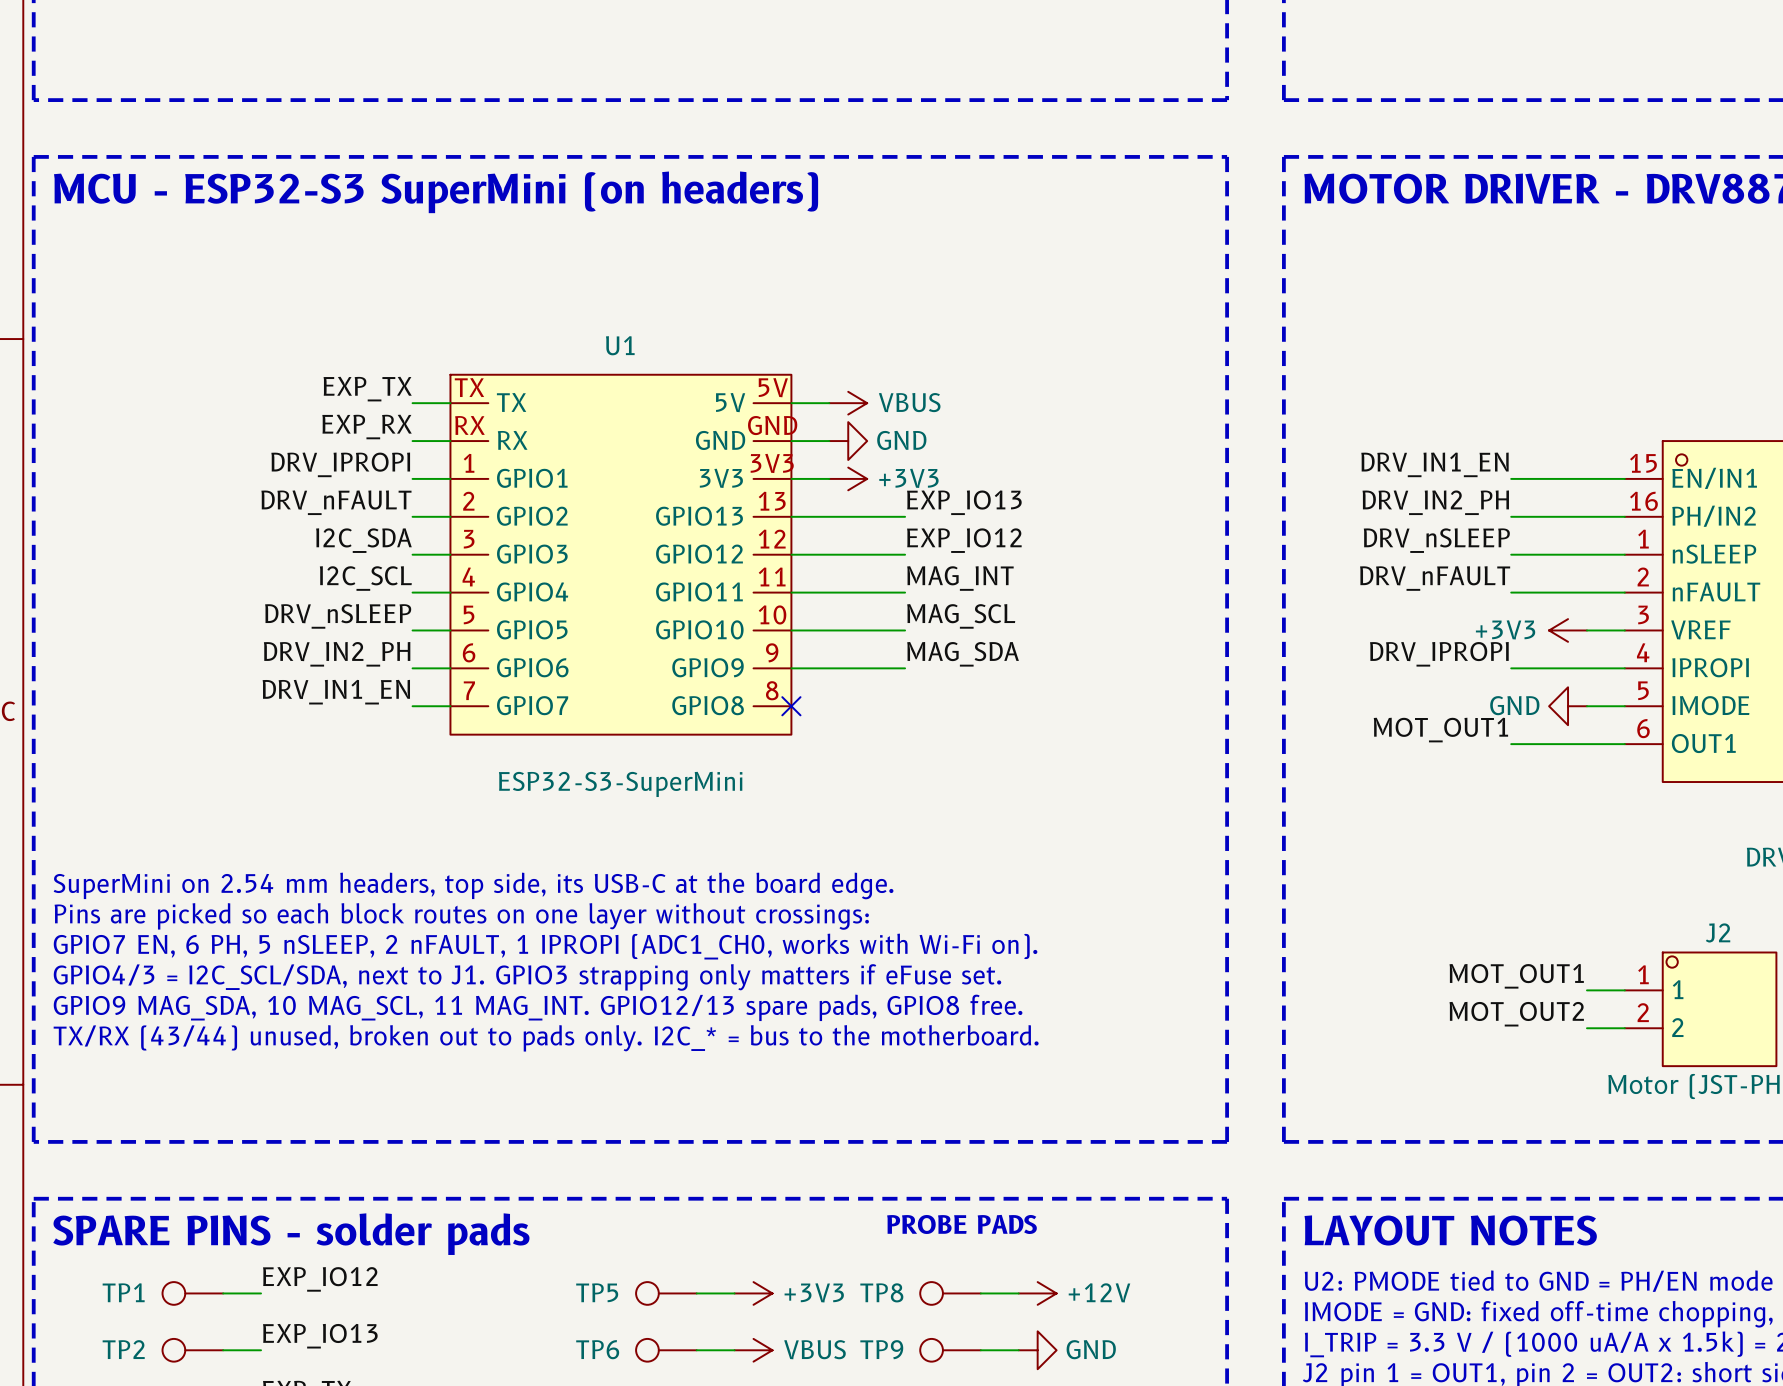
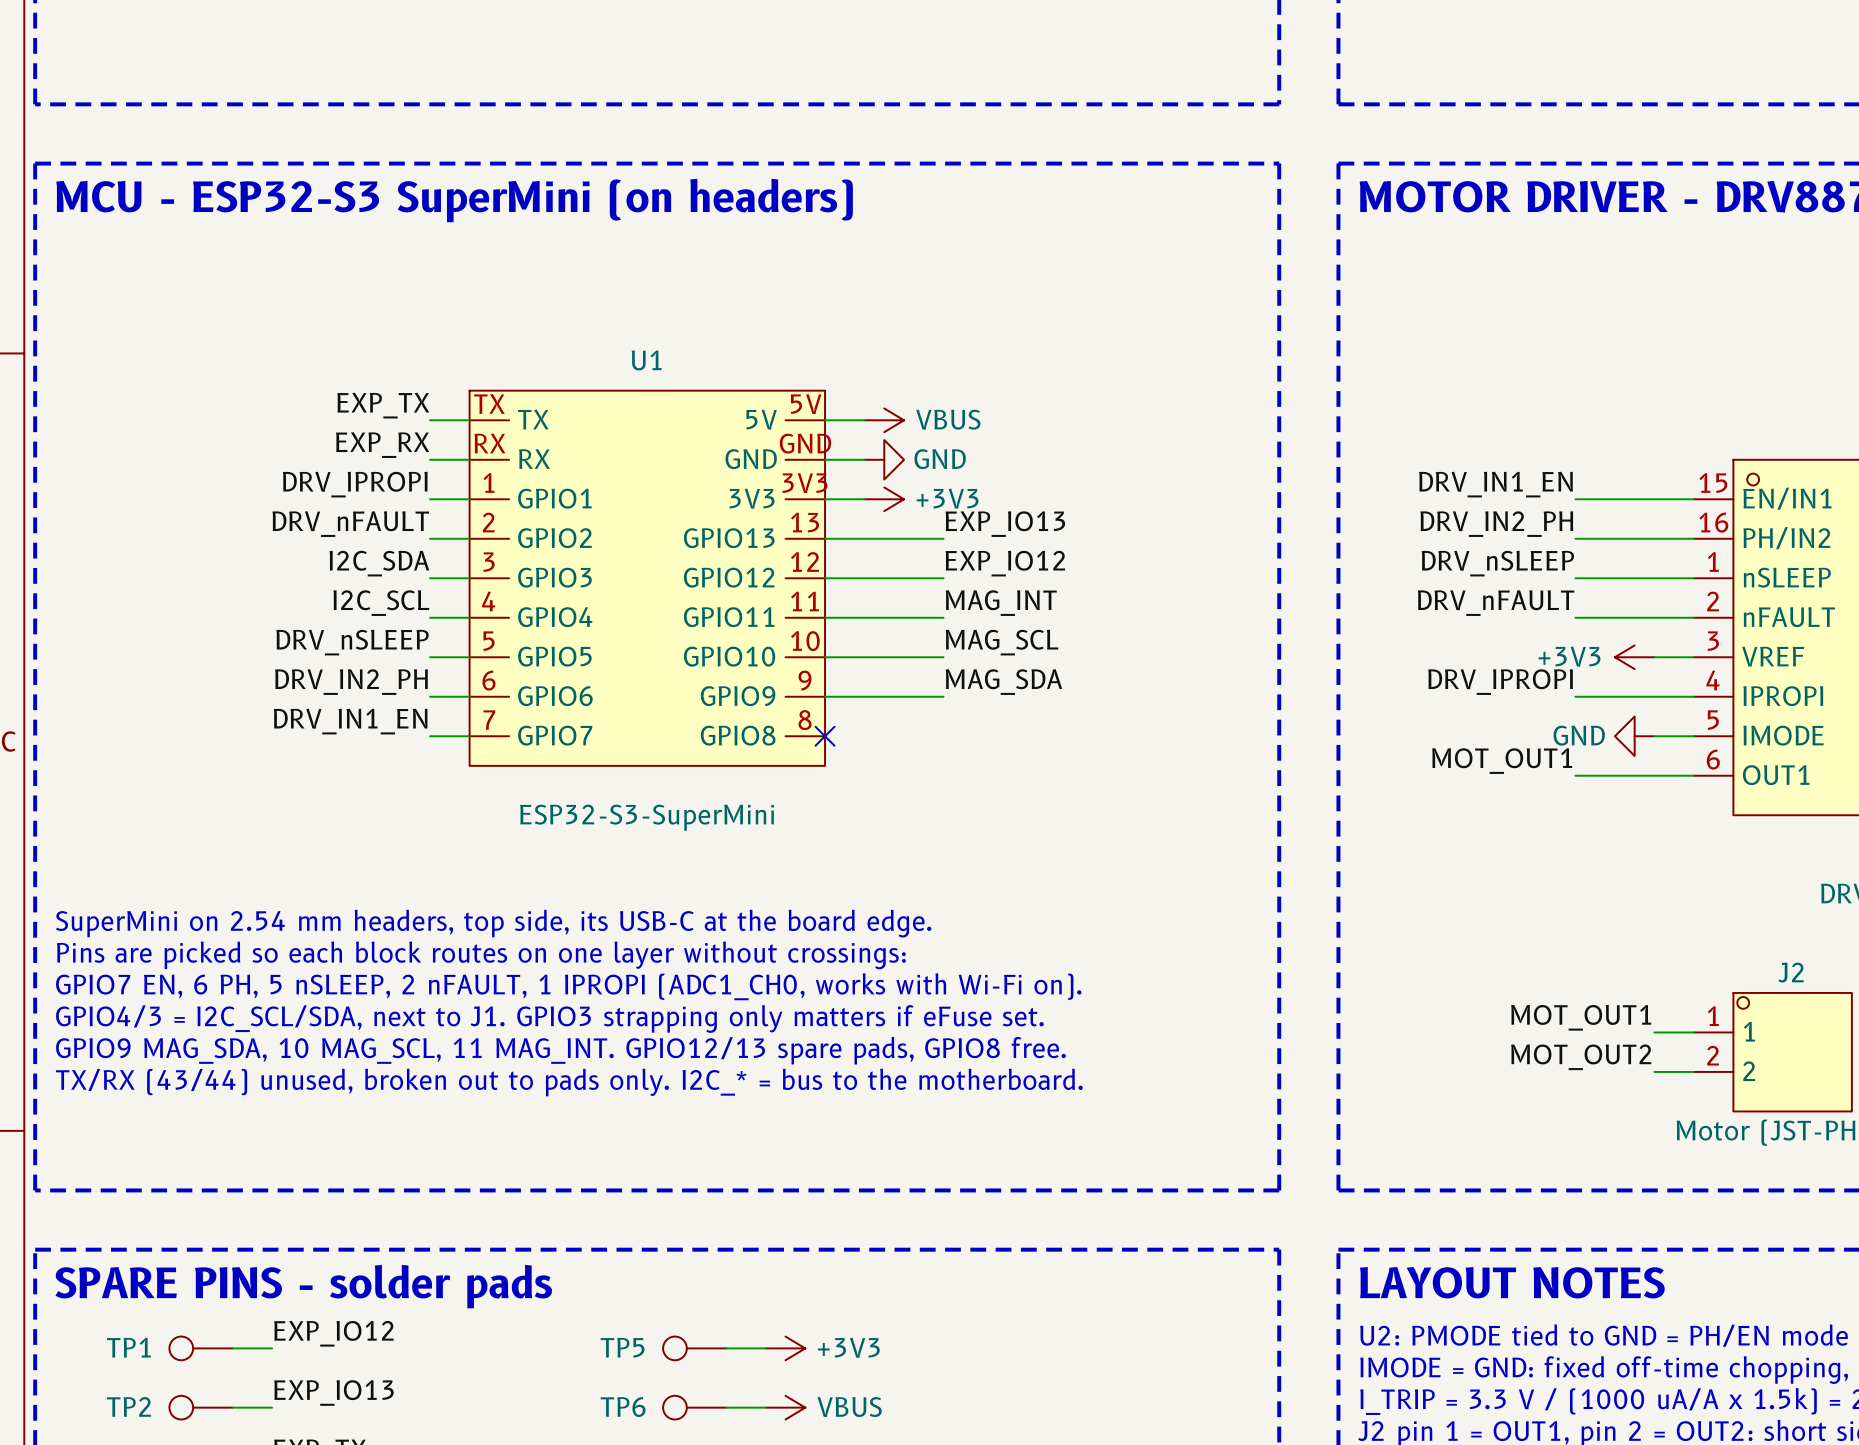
text: PROBE PADS (961, 1224) -> none
TP8: (950, 1293) -> none
wire: (980, 1293) (1018, 1293) -> none
power symbol: +12V (1037, 1293) -> none
TP9: (950, 1350) -> none
wire: (980, 1350) (1018, 1350) -> none
power symbol: GND (1037, 1350) -> none

